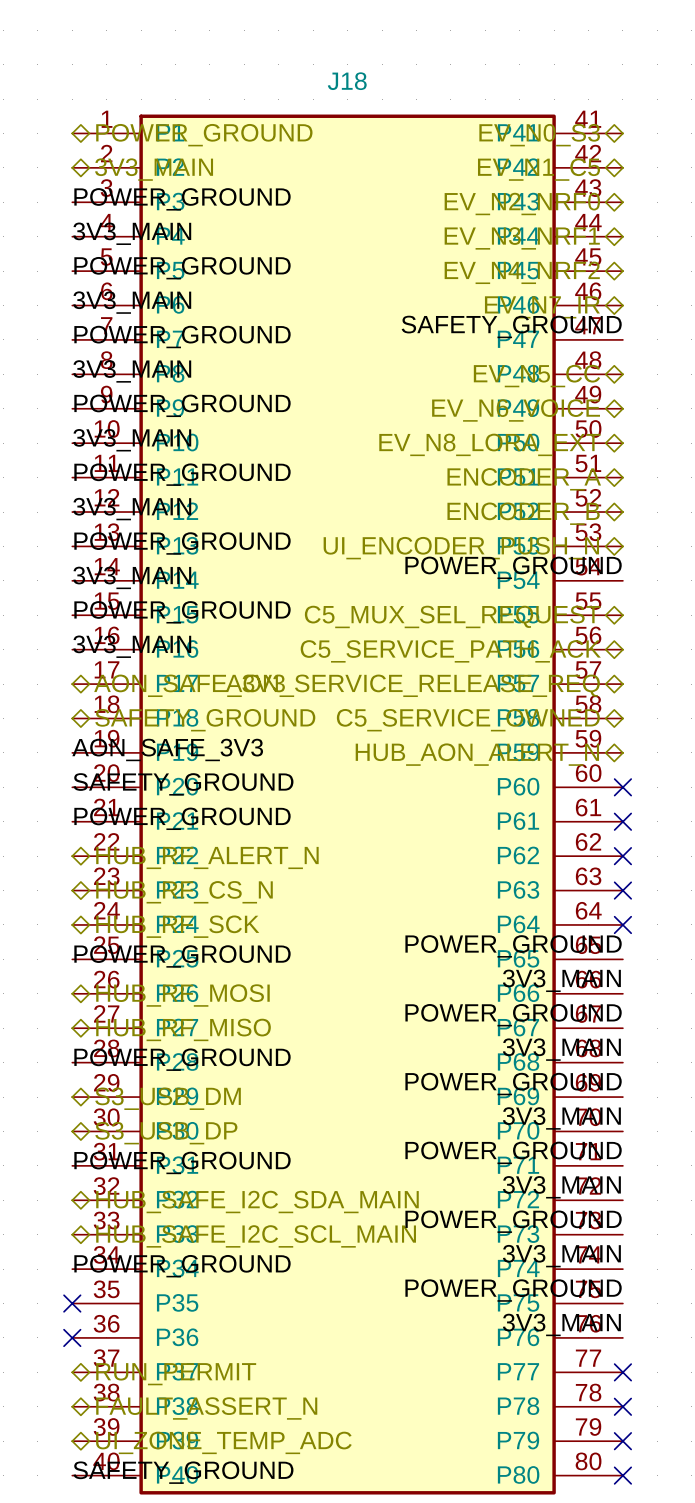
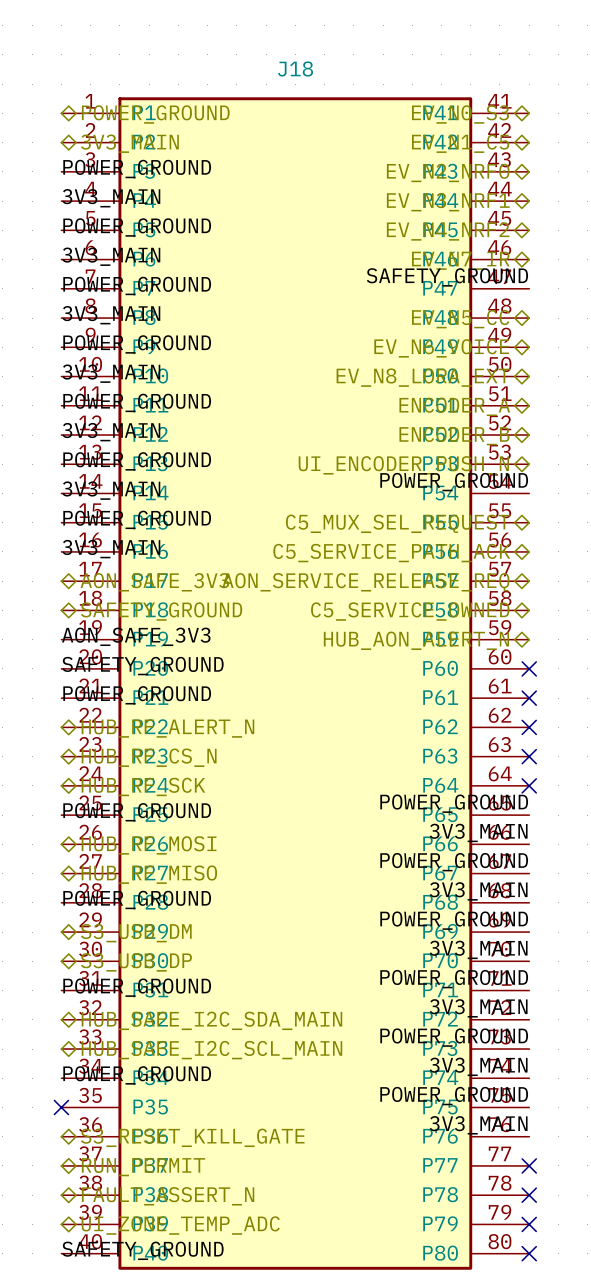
no-connect mark: (72, 1337) -> none
hierarchical label: none -> S3_RESET_KILL_GATE (192, 1137)

